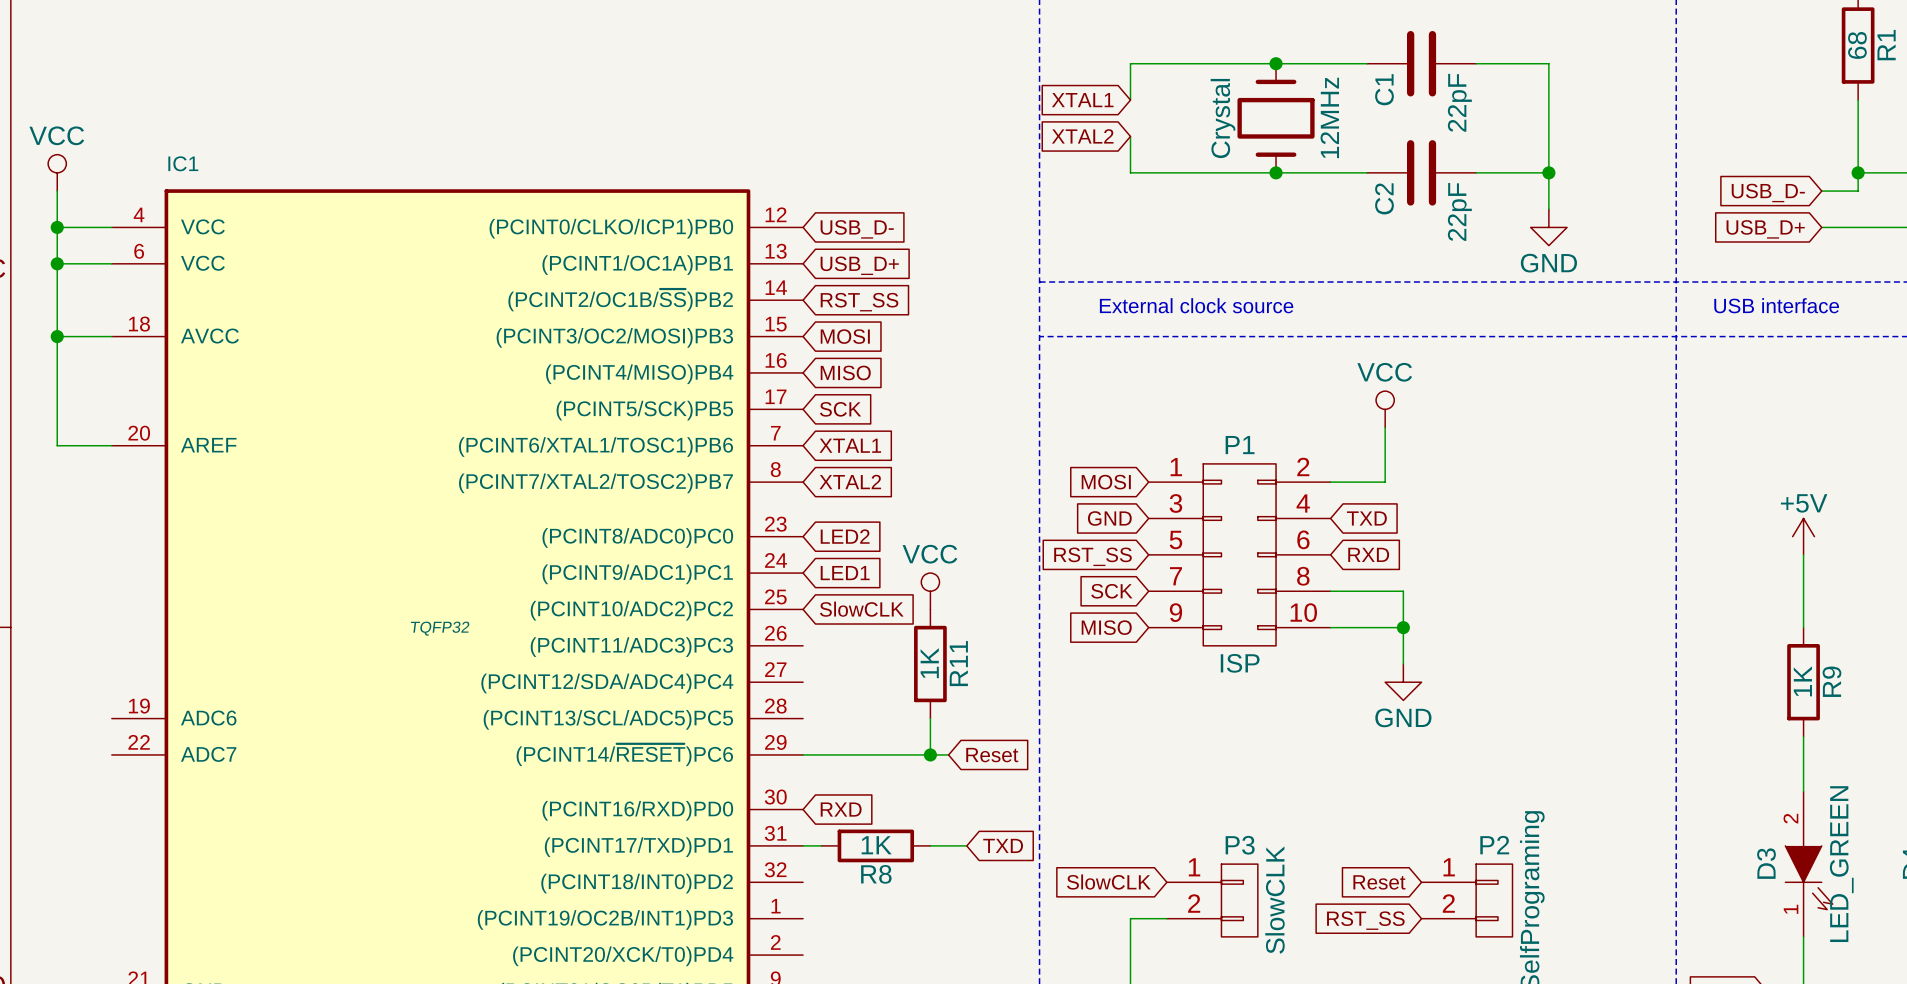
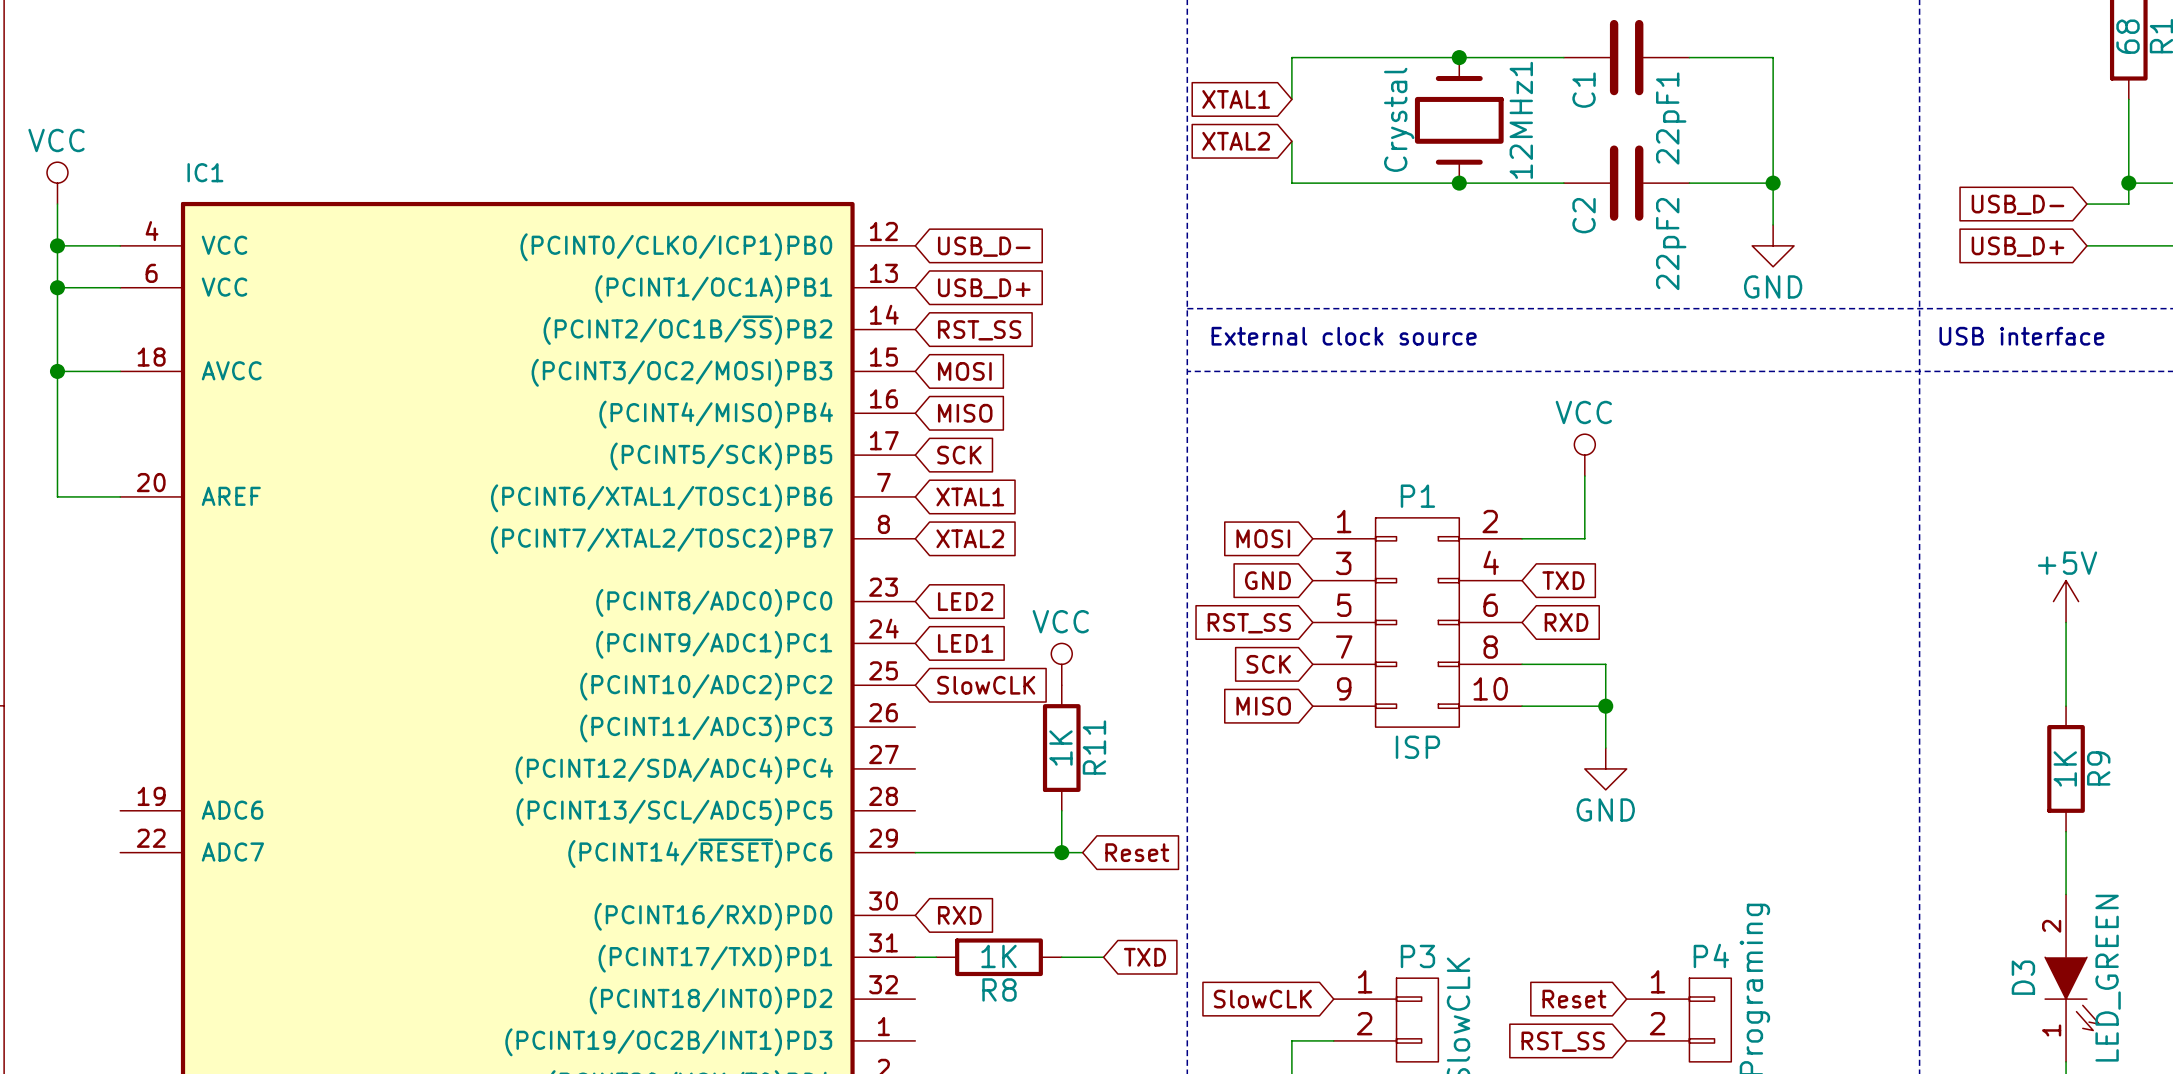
22pF name: 22pF (1459, 102) -> 22pF1 (1671, 118)
12MHz name: 12MHz (1329, 117) -> 12MHz1 (1521, 120)
22pF name: 22pF (1459, 211) -> 22pF2 (1671, 244)
IC1 text: TQFP32 (440, 628) -> none
P2 name: P2 (1494, 845) -> P4 (1711, 955)

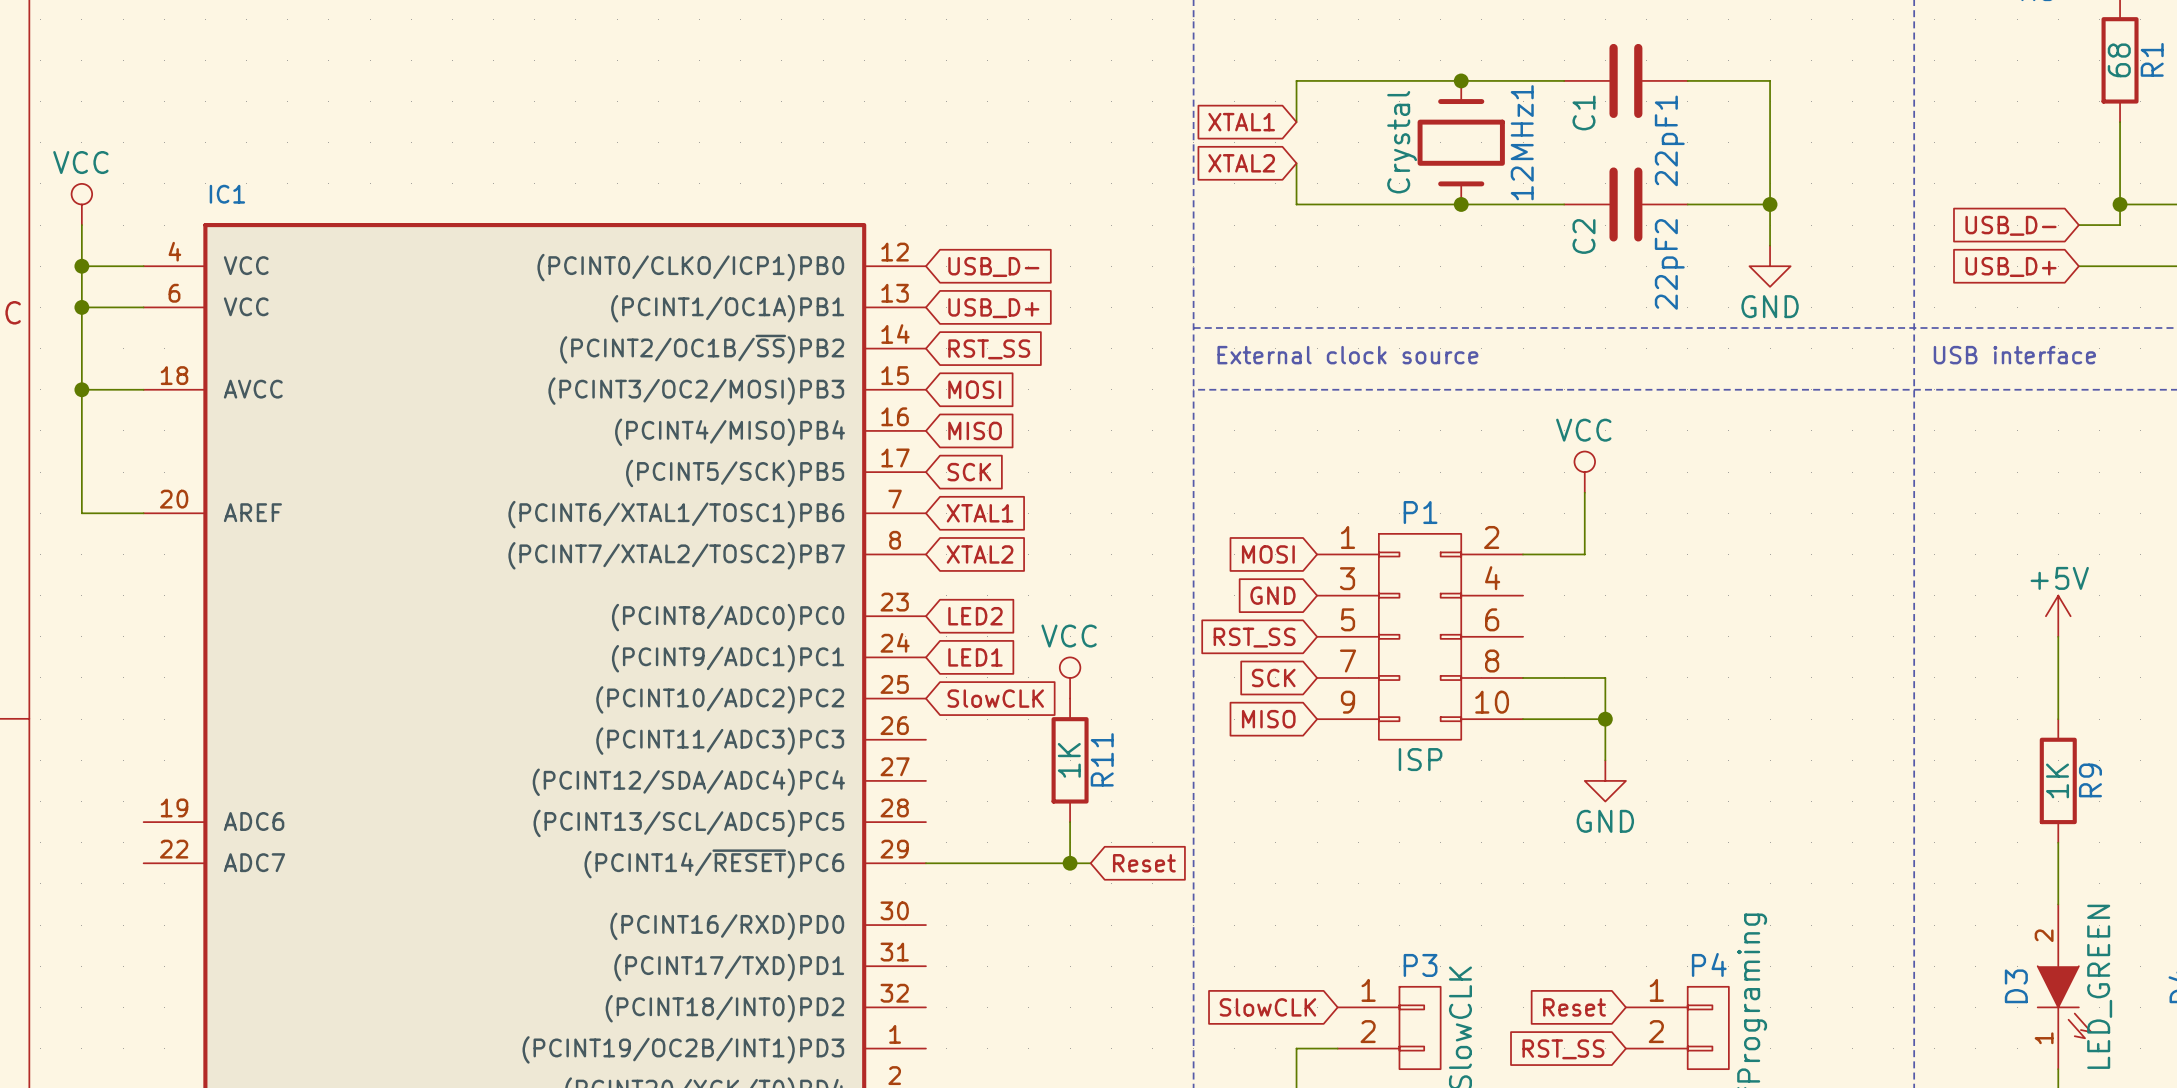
global label: TXD (1563, 580) -> none
global label: RXD (1566, 622) -> none
global label: RXD (959, 915) -> none
wire: (915, 957) (936, 957) -> none
R8: 1K (998, 957) -> none
wire: (1061, 957) (1103, 957) -> none
global label: TXD (1144, 957) -> none

